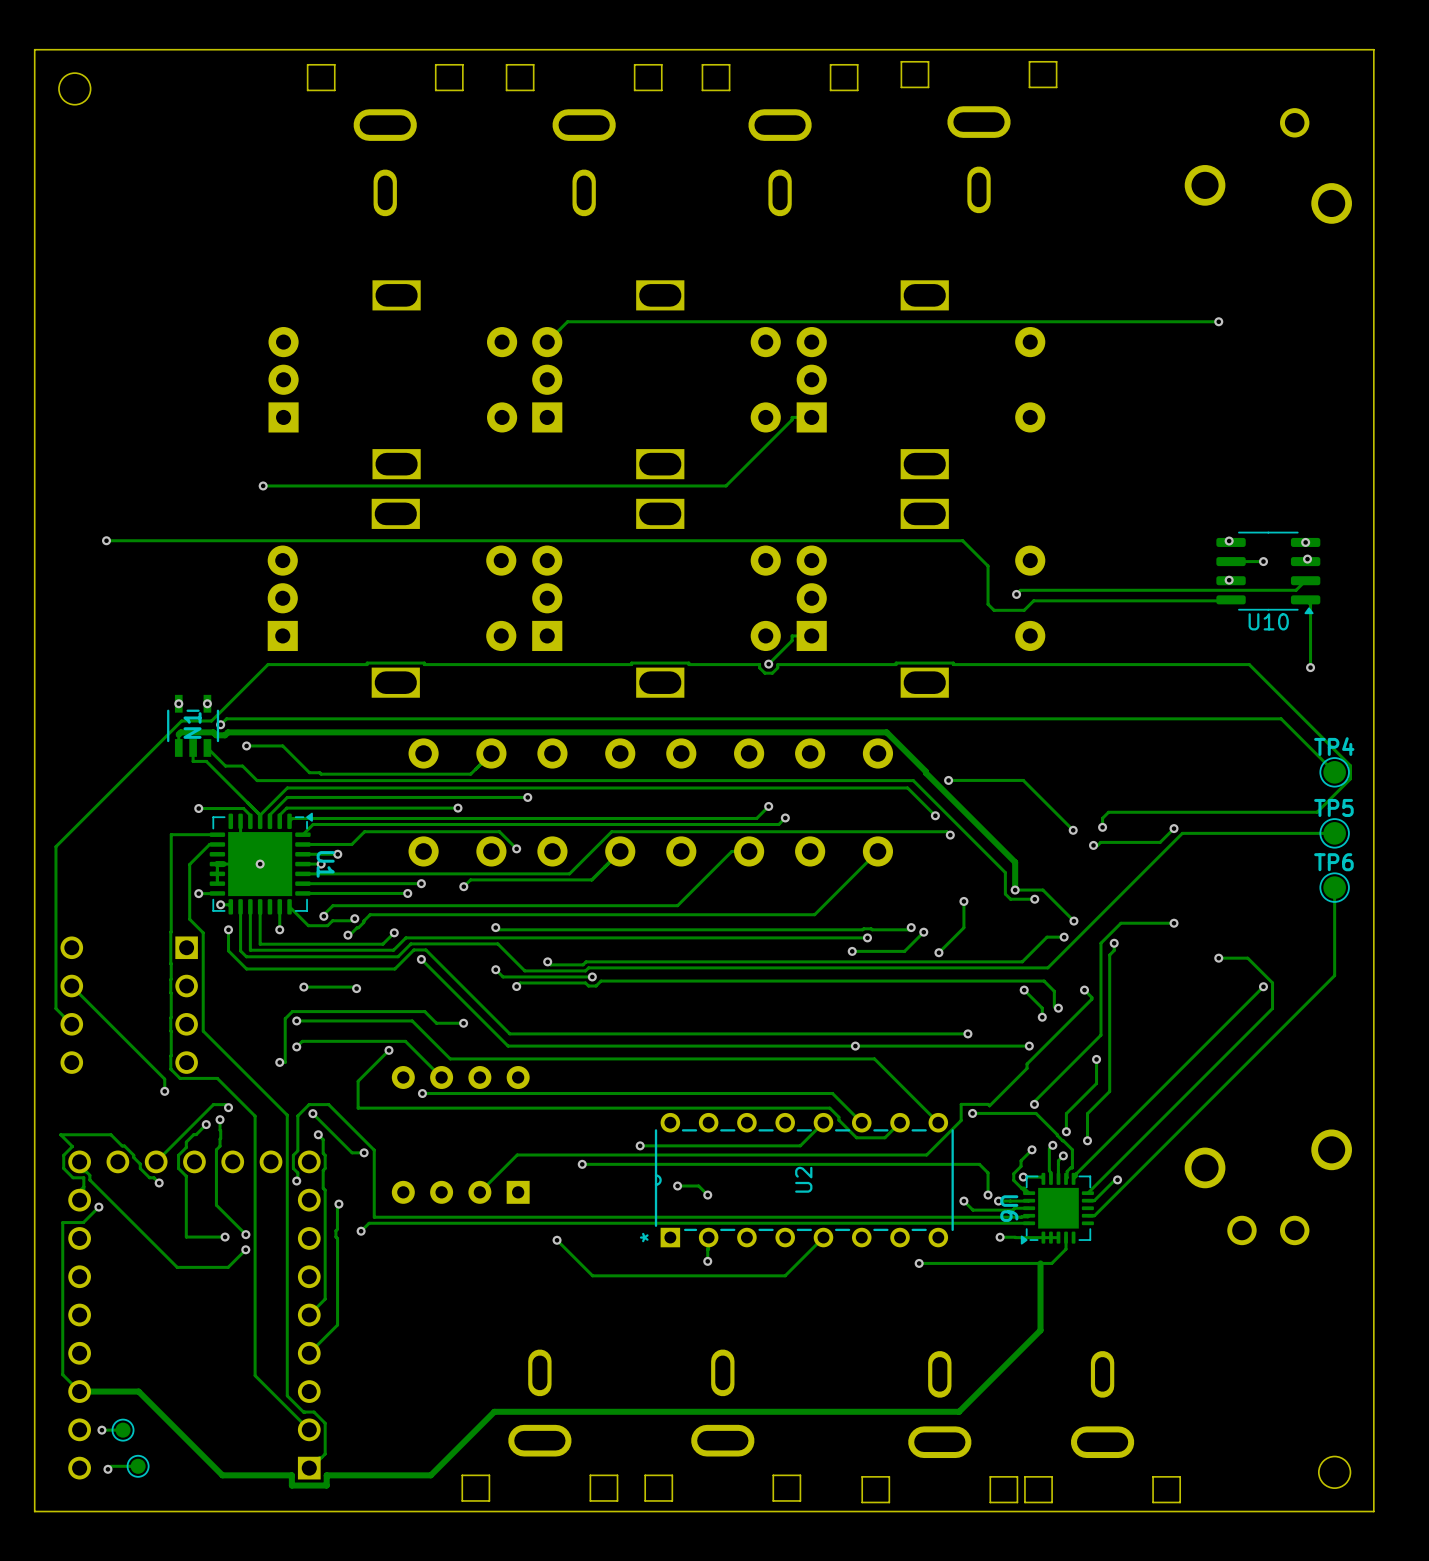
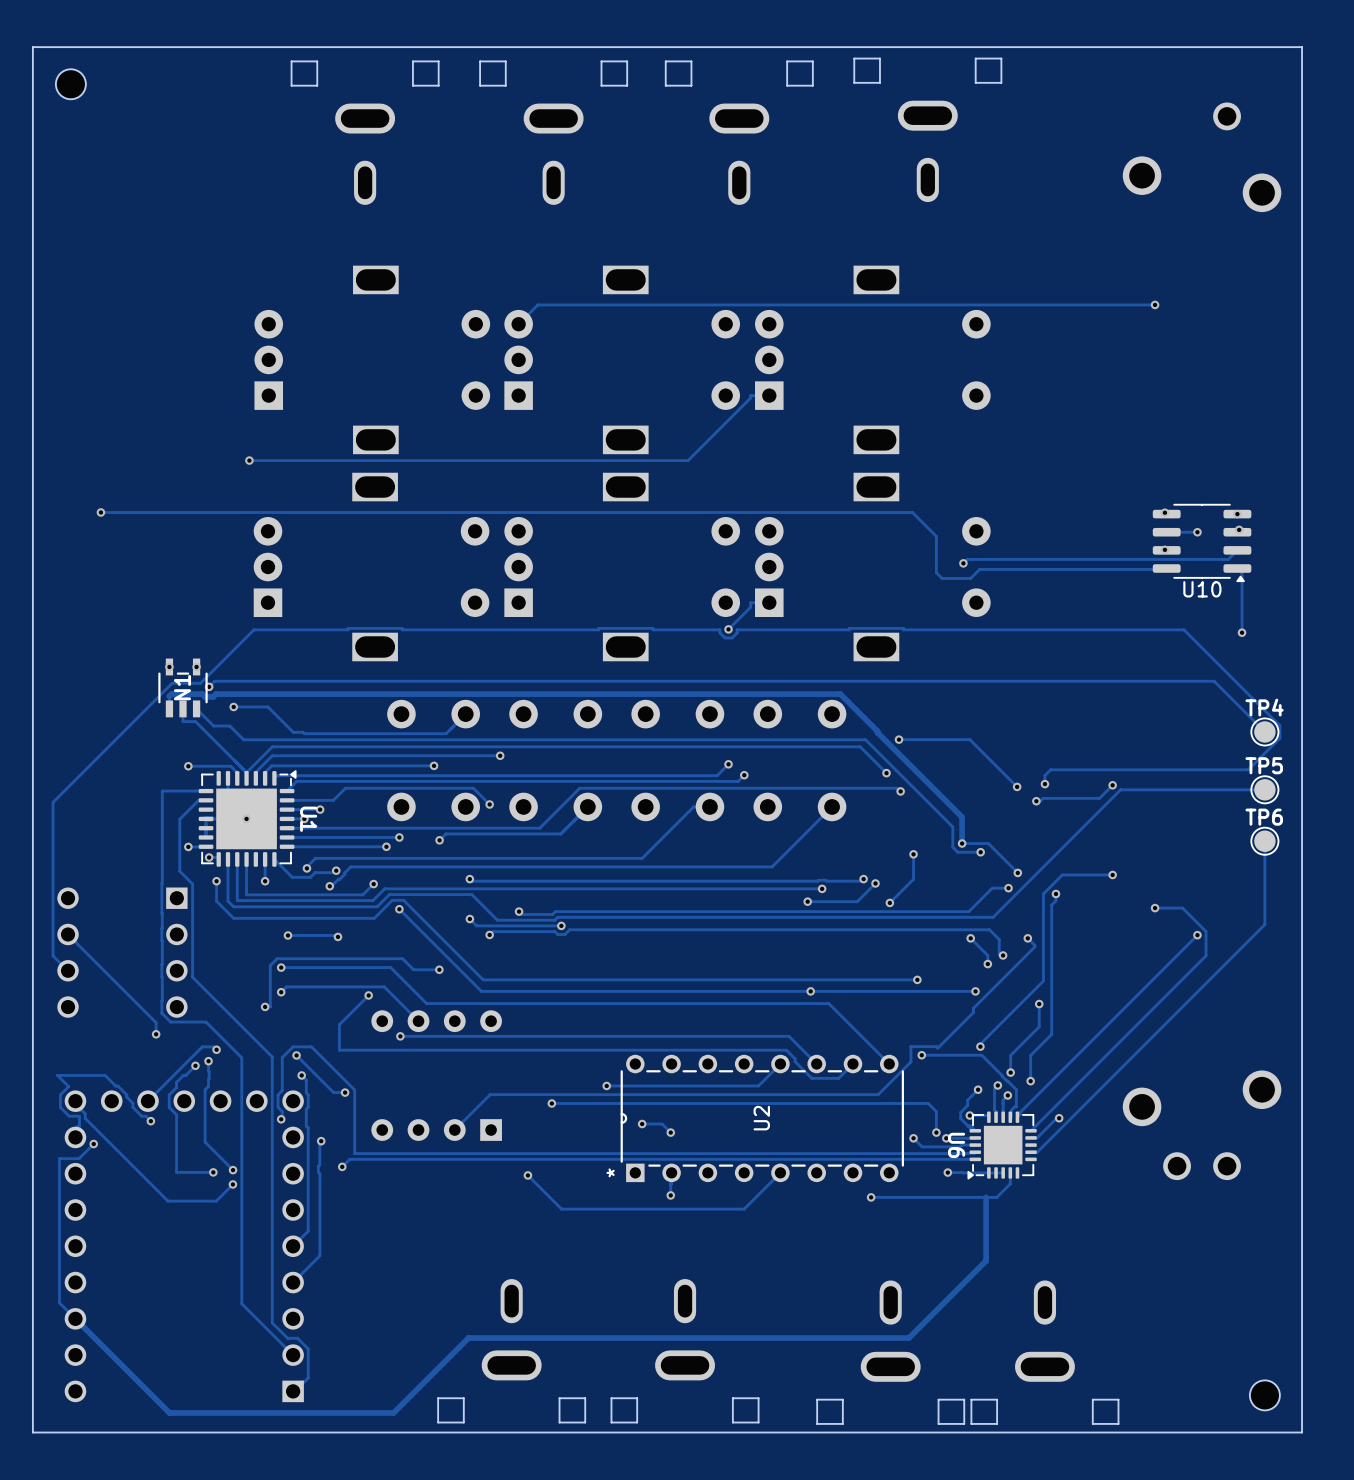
track: (79, 1391) (138, 1391) (222, 1475) (291, 1475) (291, 1485) (326, 1485) (326, 1475) (430, 1475) -> (75, 1318) (169, 1412) (393, 1412) (408, 1398)
via: (101, 1430) -> none
track: (123, 1430) (101, 1430) -> none
part: (123, 1430) -> none
track: (138, 1466) (110, 1466) (107, 1469) -> none
part: (138, 1466) -> none
via: (107, 1469) -> none

